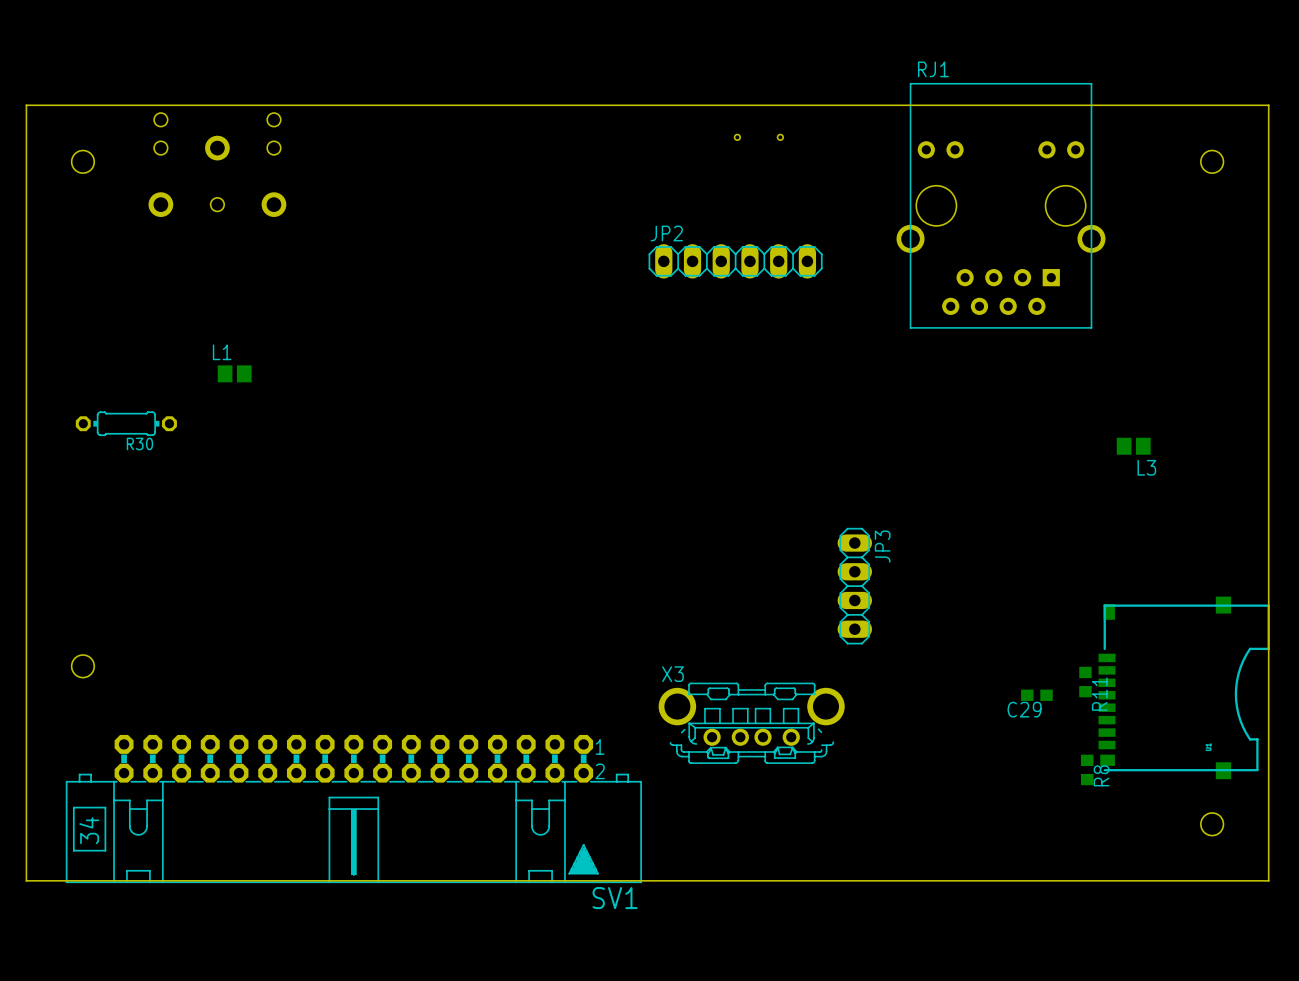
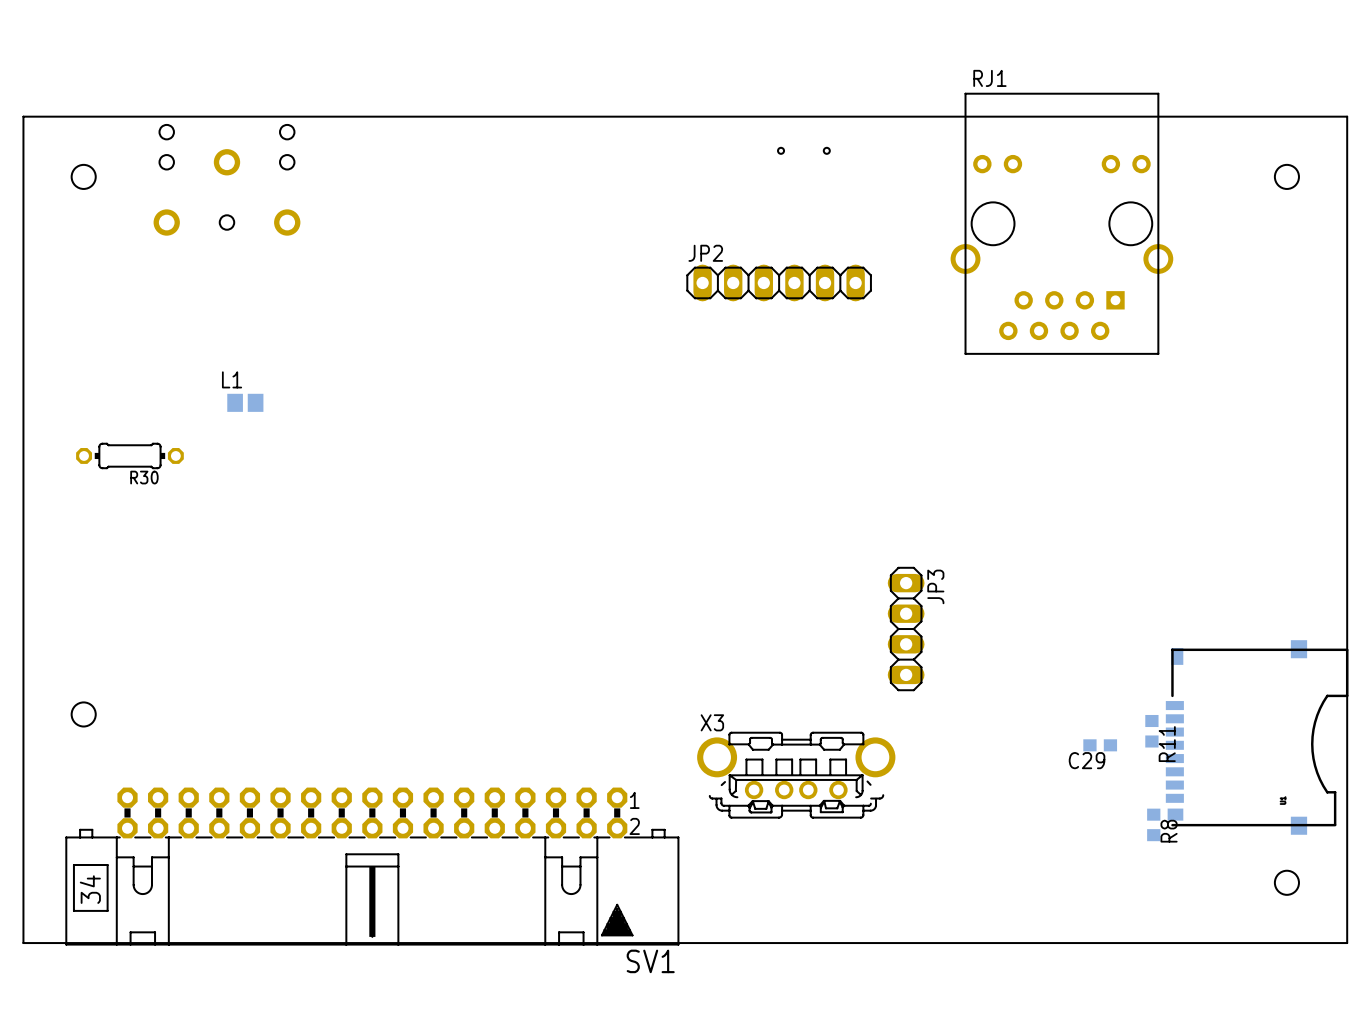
L3: (1133, 446) -> none

